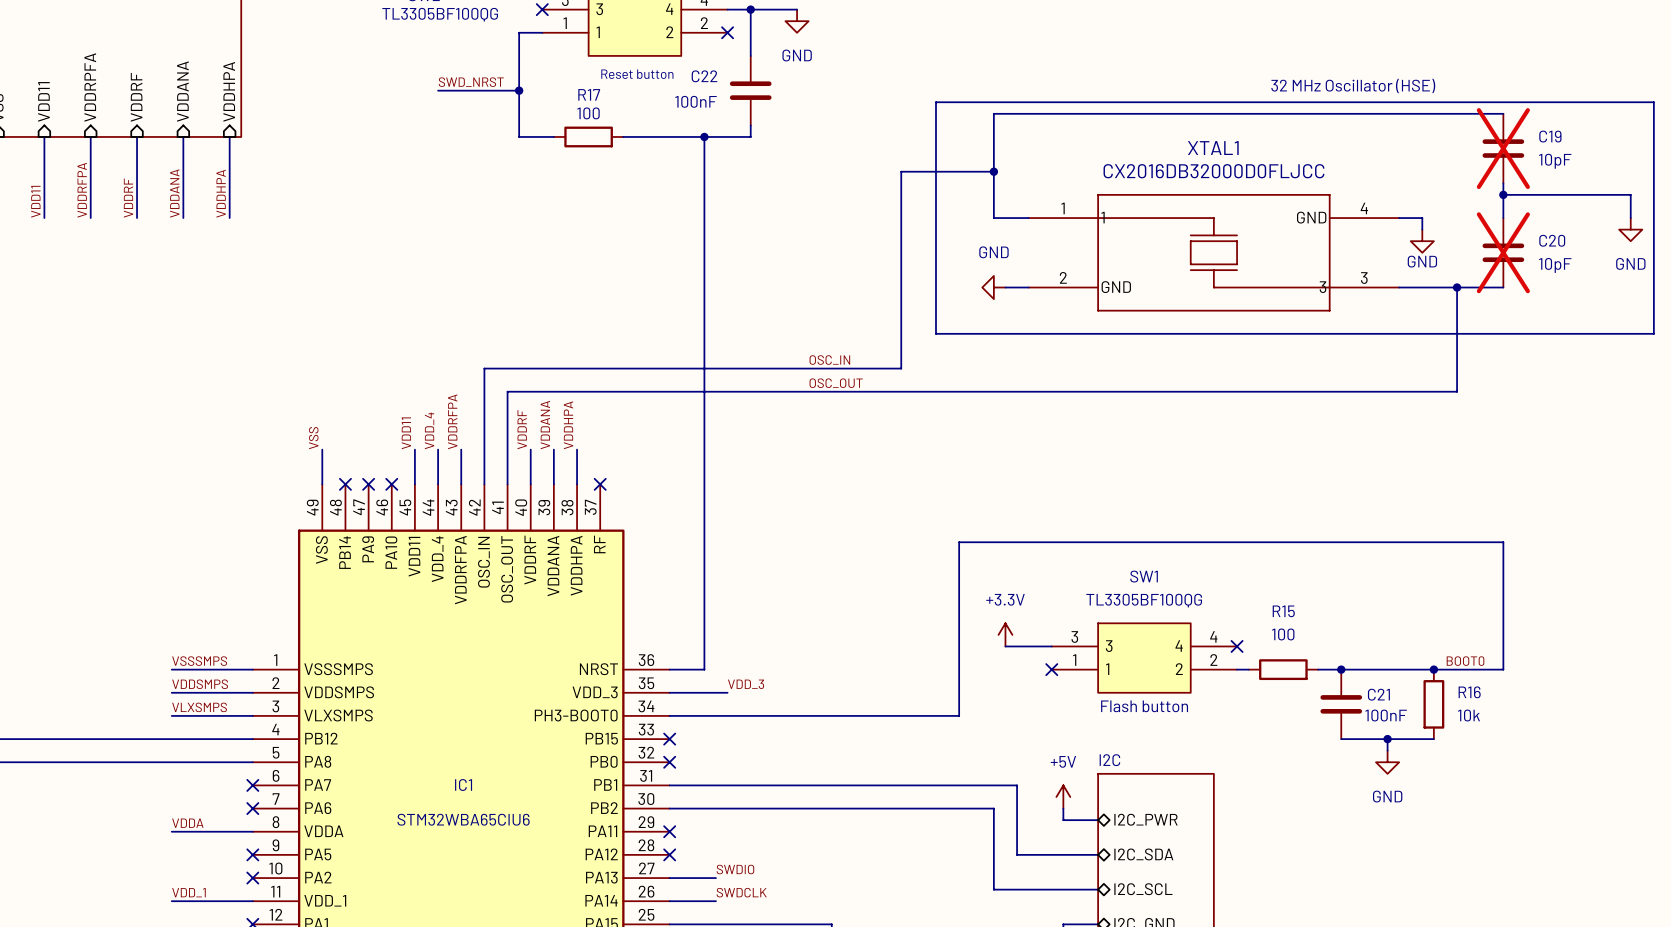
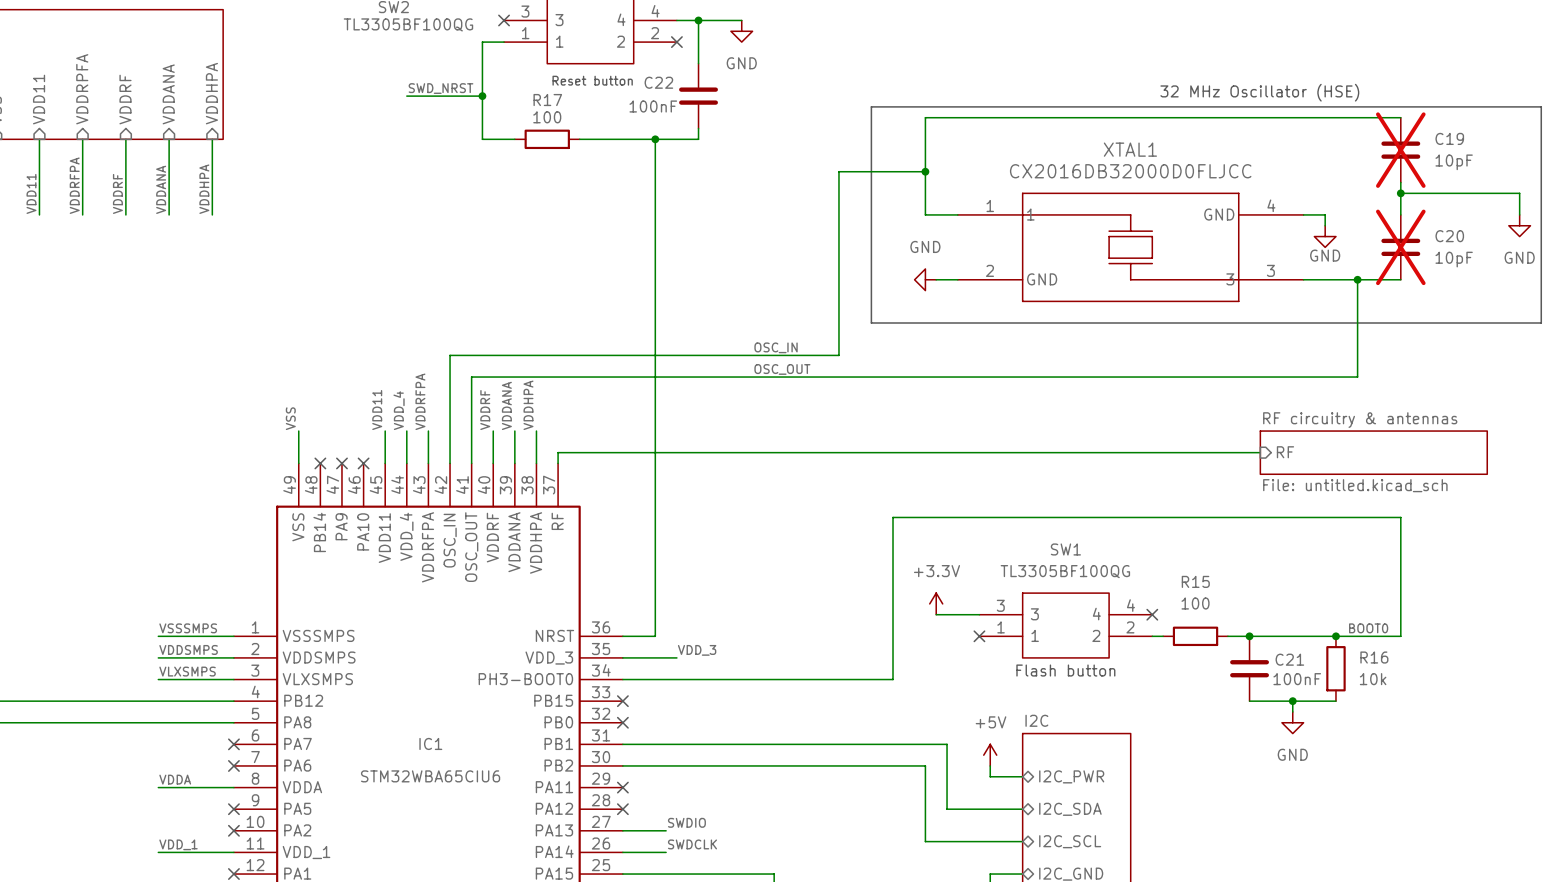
wire: none -> (1260, 452) (558, 452) (558, 463)
sheet pin: none -> RF (1285, 452)
sheet RF circuitry & antennas: none -> File: untitled.kicad_sch (1373, 452)
no-connect mark: (600, 484) -> none

